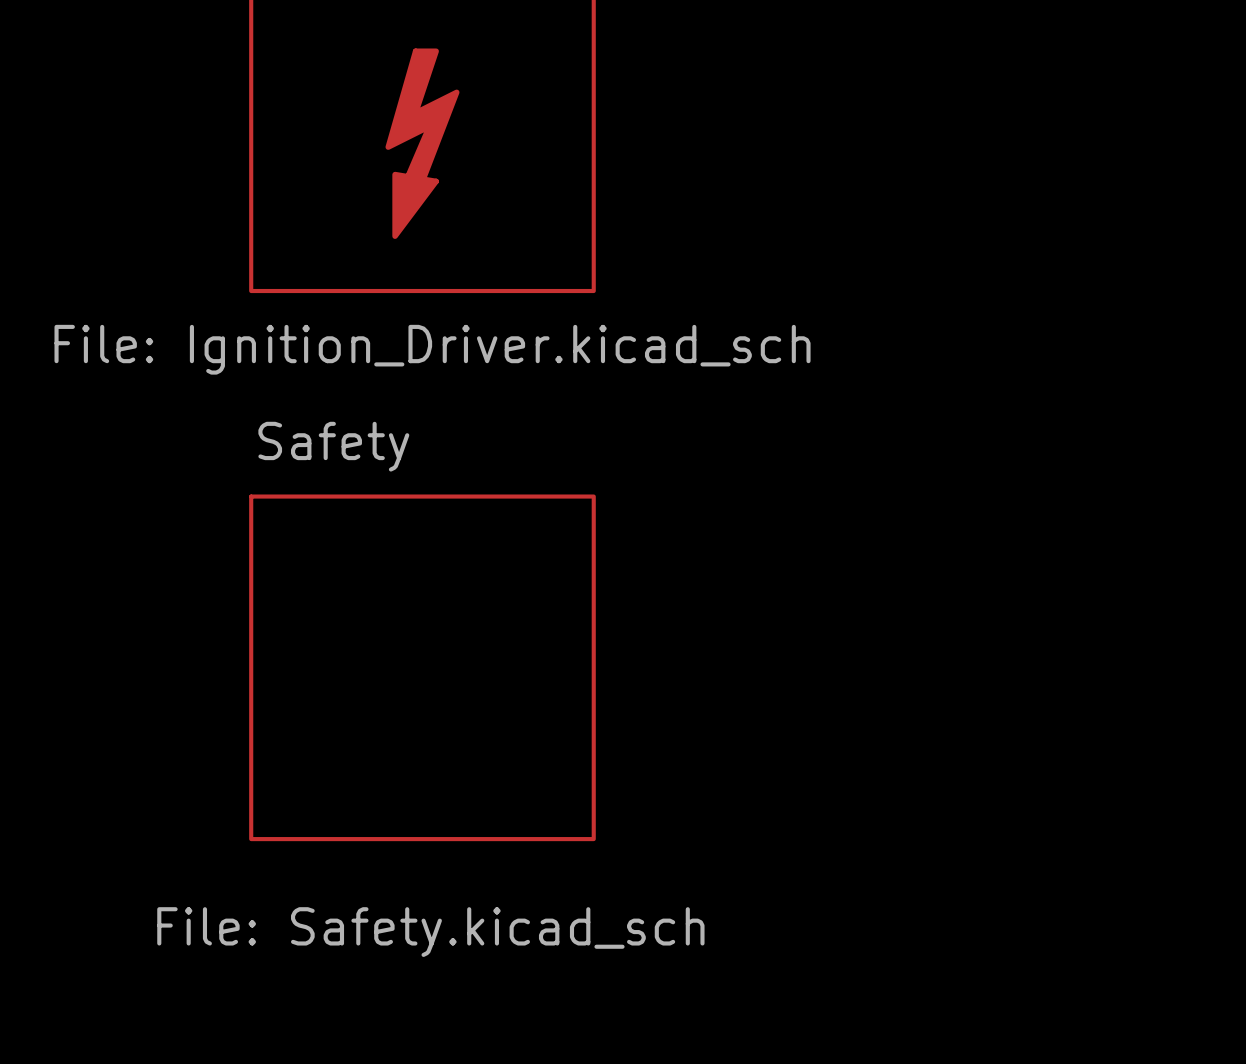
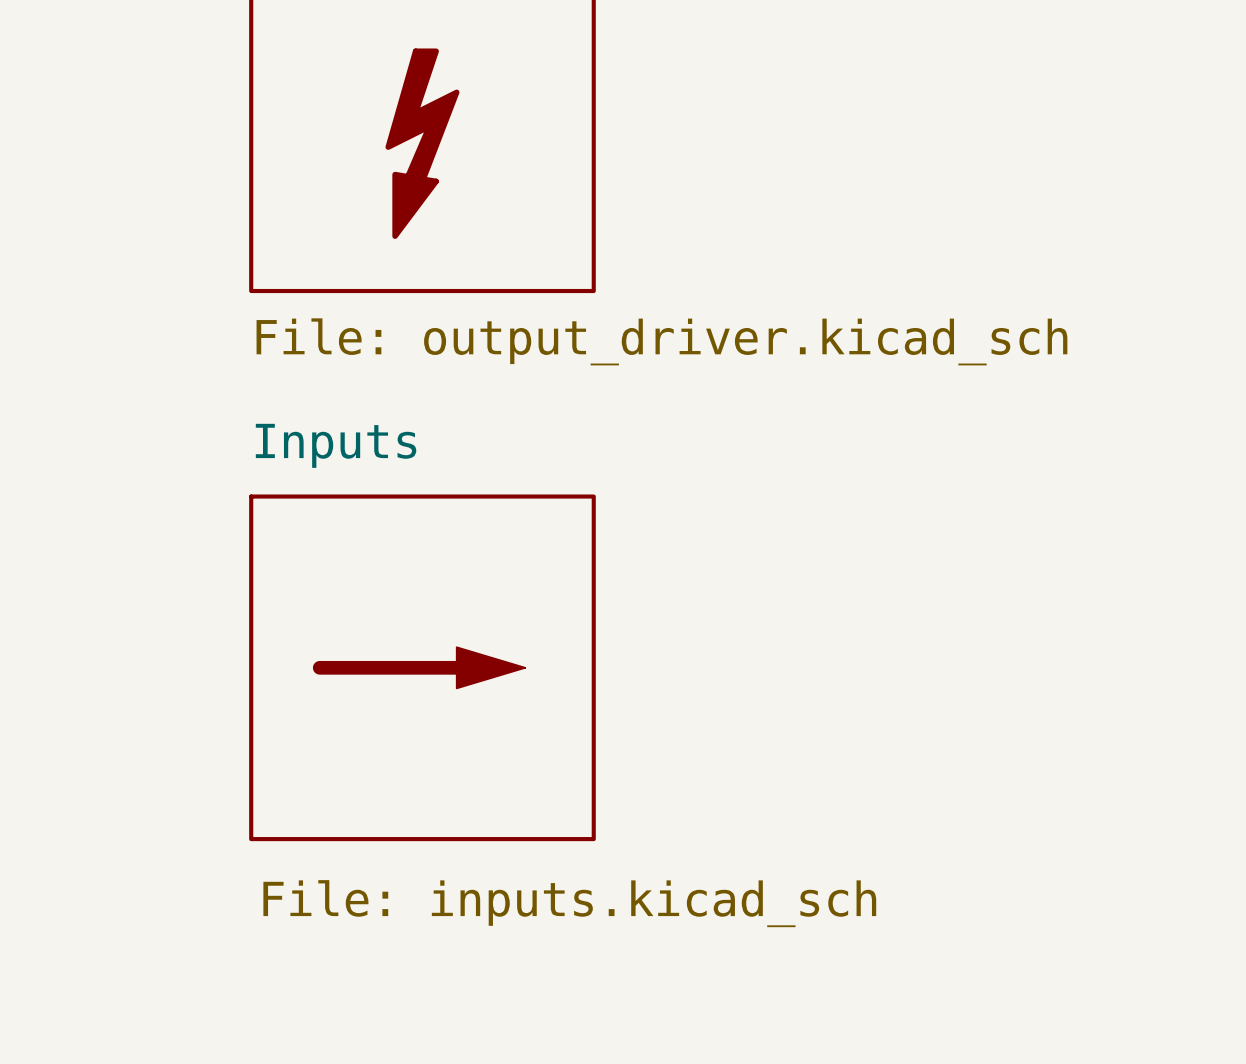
sheet value: File: Ignition_Driver.kicad_sch (432, 349) -> File: output_driver.kicad_sch (661, 341)
sheet Safety name: Safety (333, 446) -> Inputs (336, 445)
power symbol: none -> (419, 667)
sheet Safety value: File: Safety.kicad_sch (430, 932) -> File: inputs.kicad_sch (569, 903)

